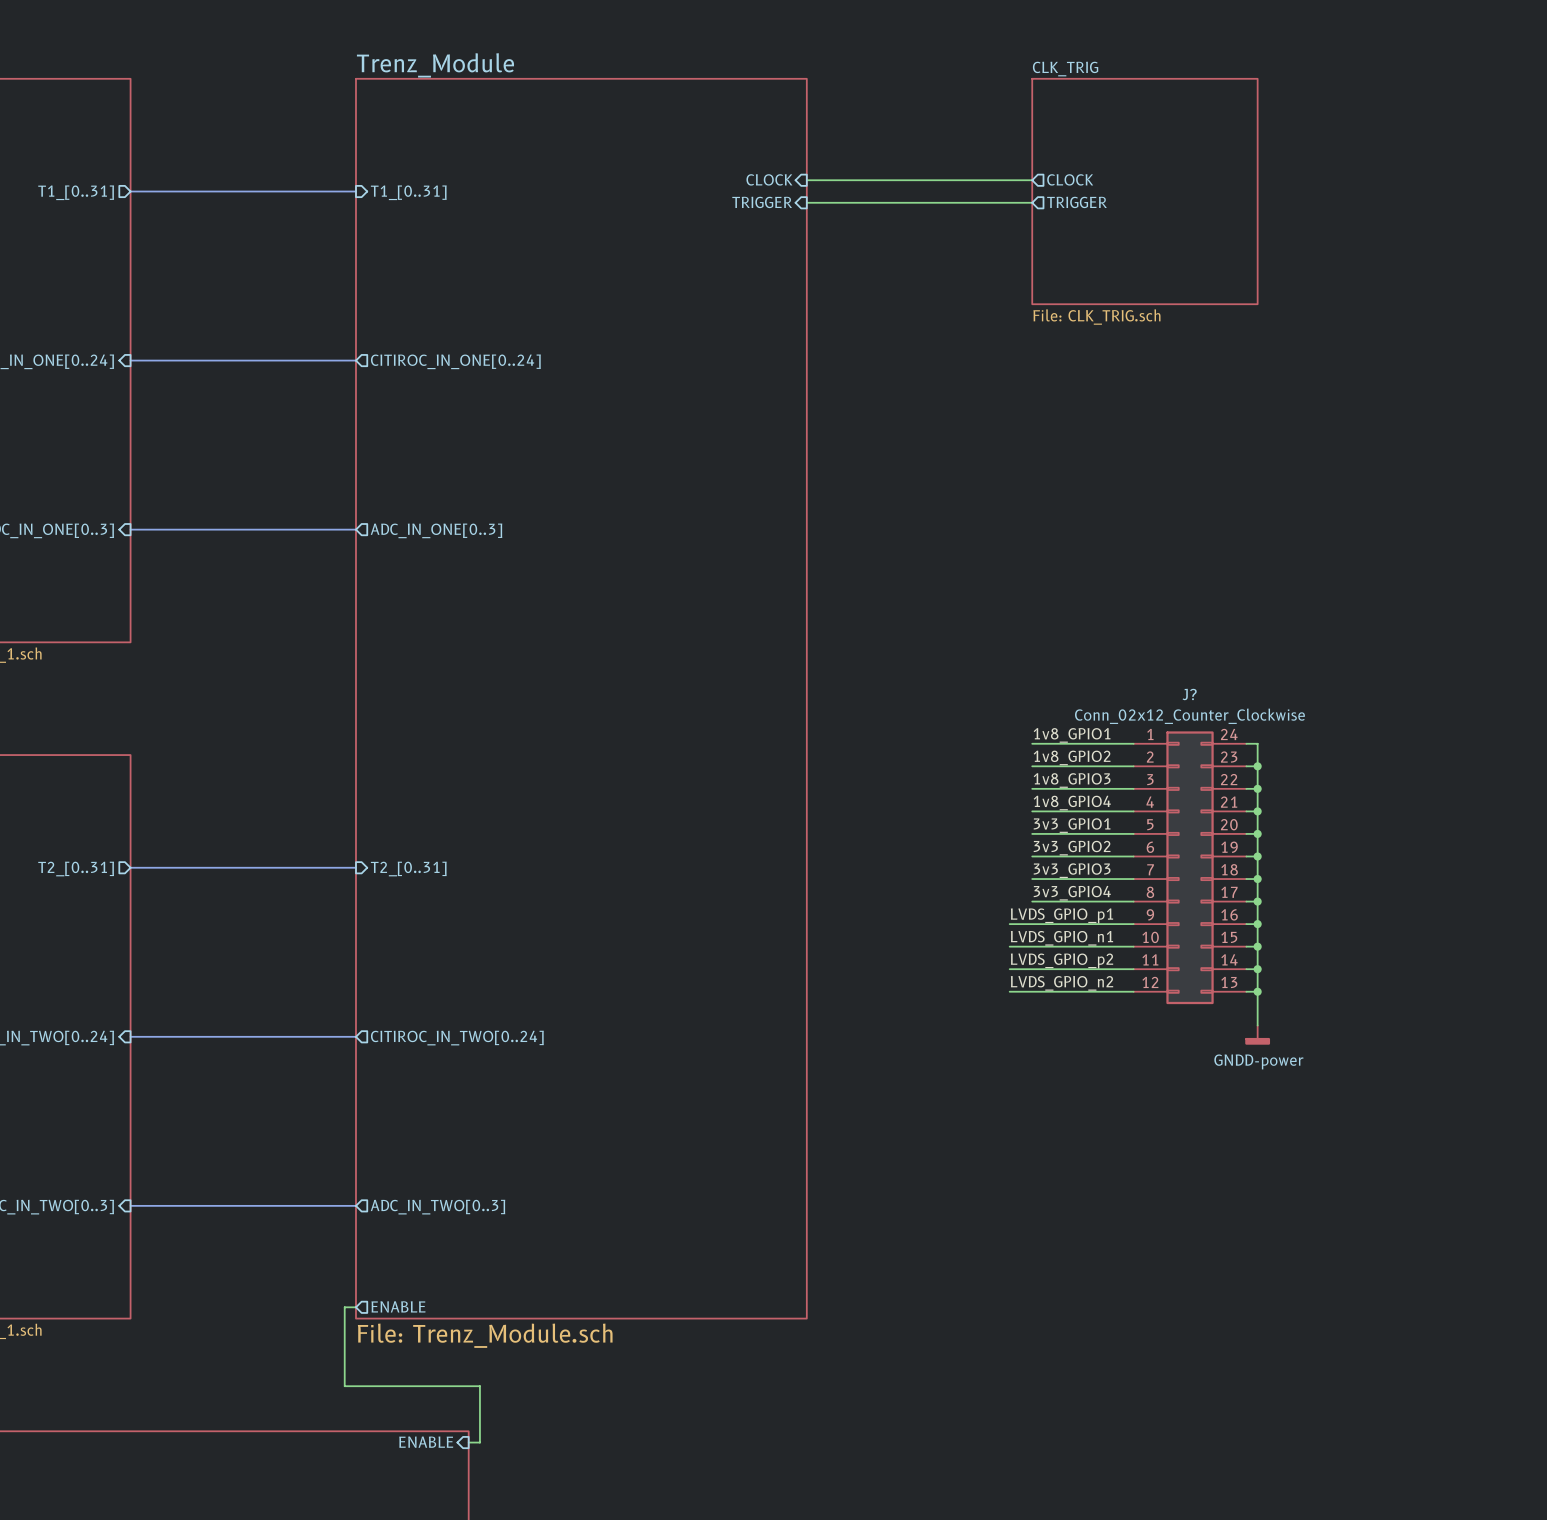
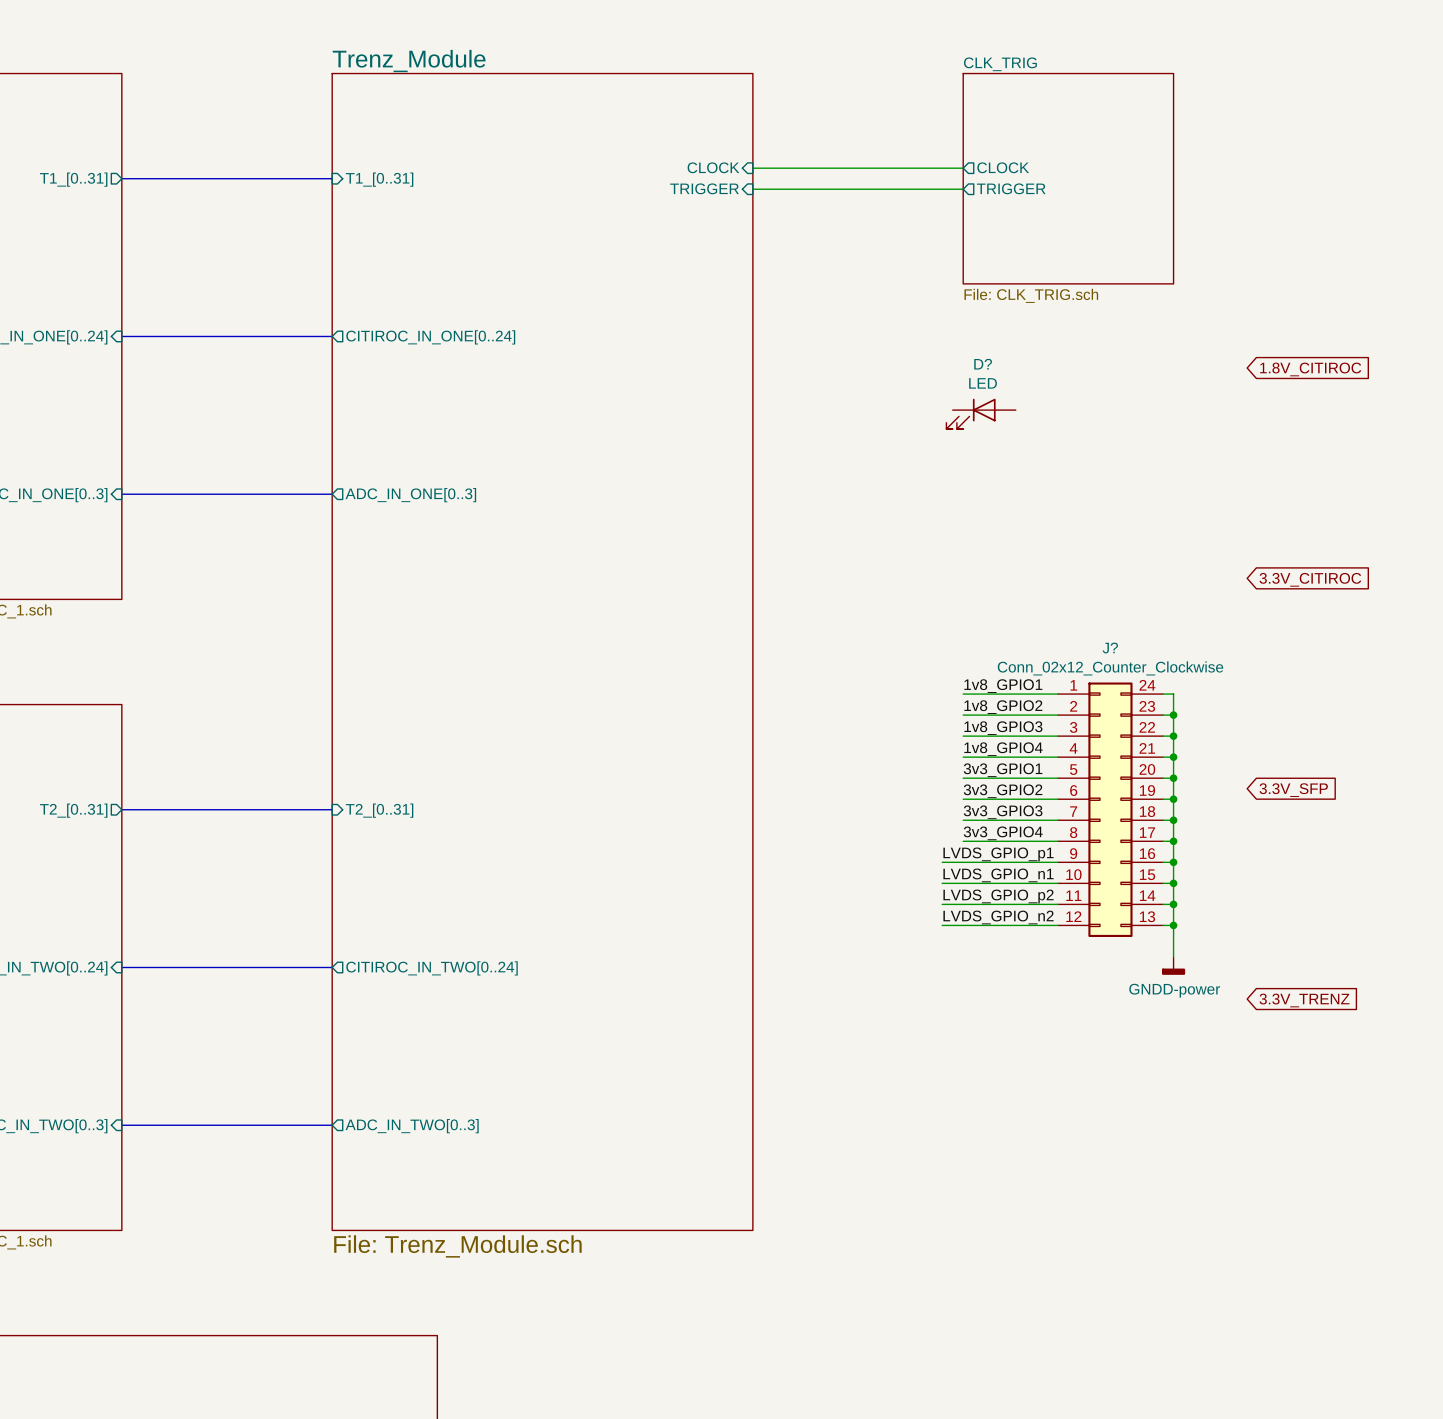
global label: none -> 1.8V_CITIROC (1310, 369)
D?: none -> LED (981, 413)
global label: none -> 3.3V_CITIROC (1310, 579)
global label: none -> 3.3V_SFP (1293, 790)
global label: none -> 3.3V_TRENZ (1304, 1000)
sheet pin: ENABLE (398, 1306) -> none
wire: (355, 1307) (344, 1307) (344, 1386) (479, 1386) (479, 1442) (468, 1442) -> none
sheet pin: ENABLE (426, 1442) -> none

